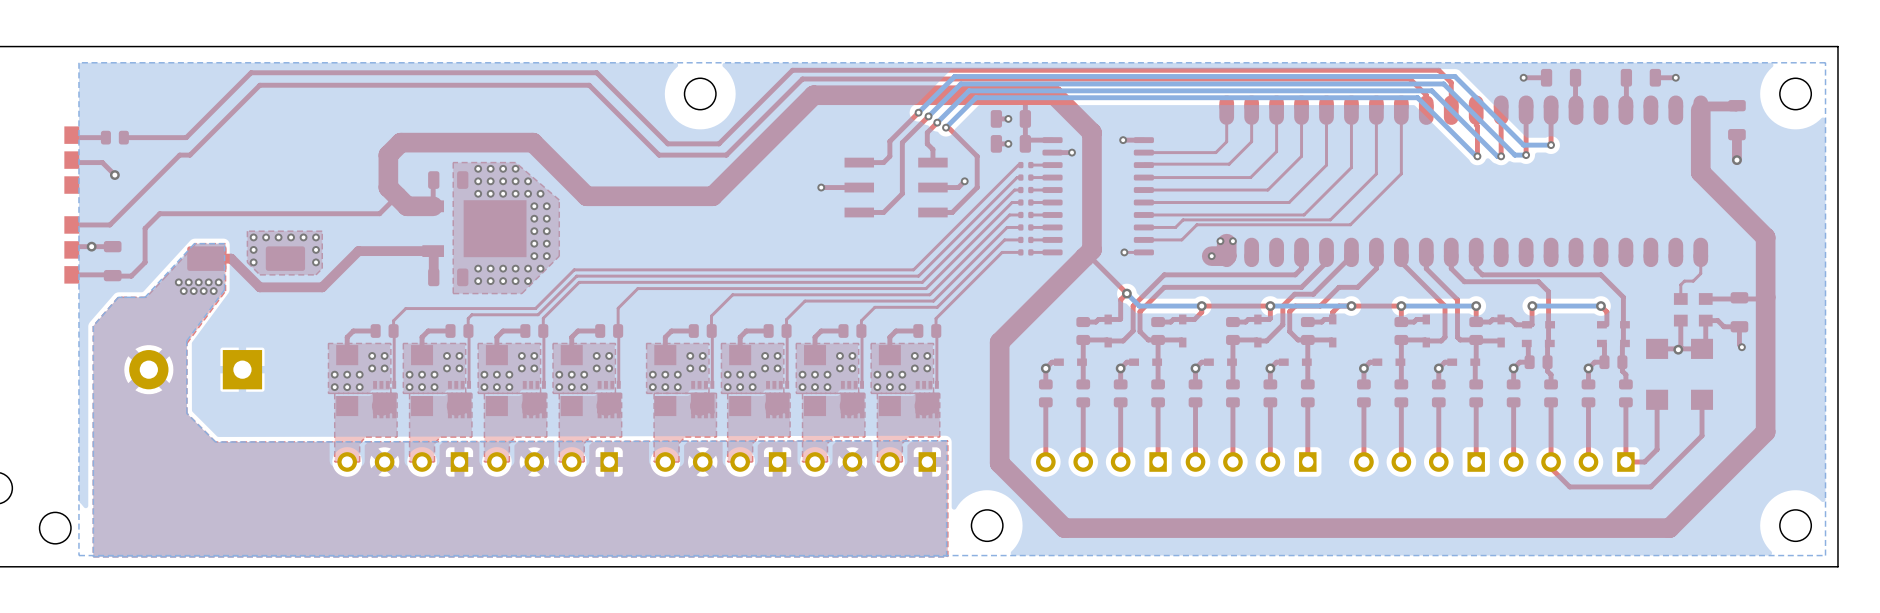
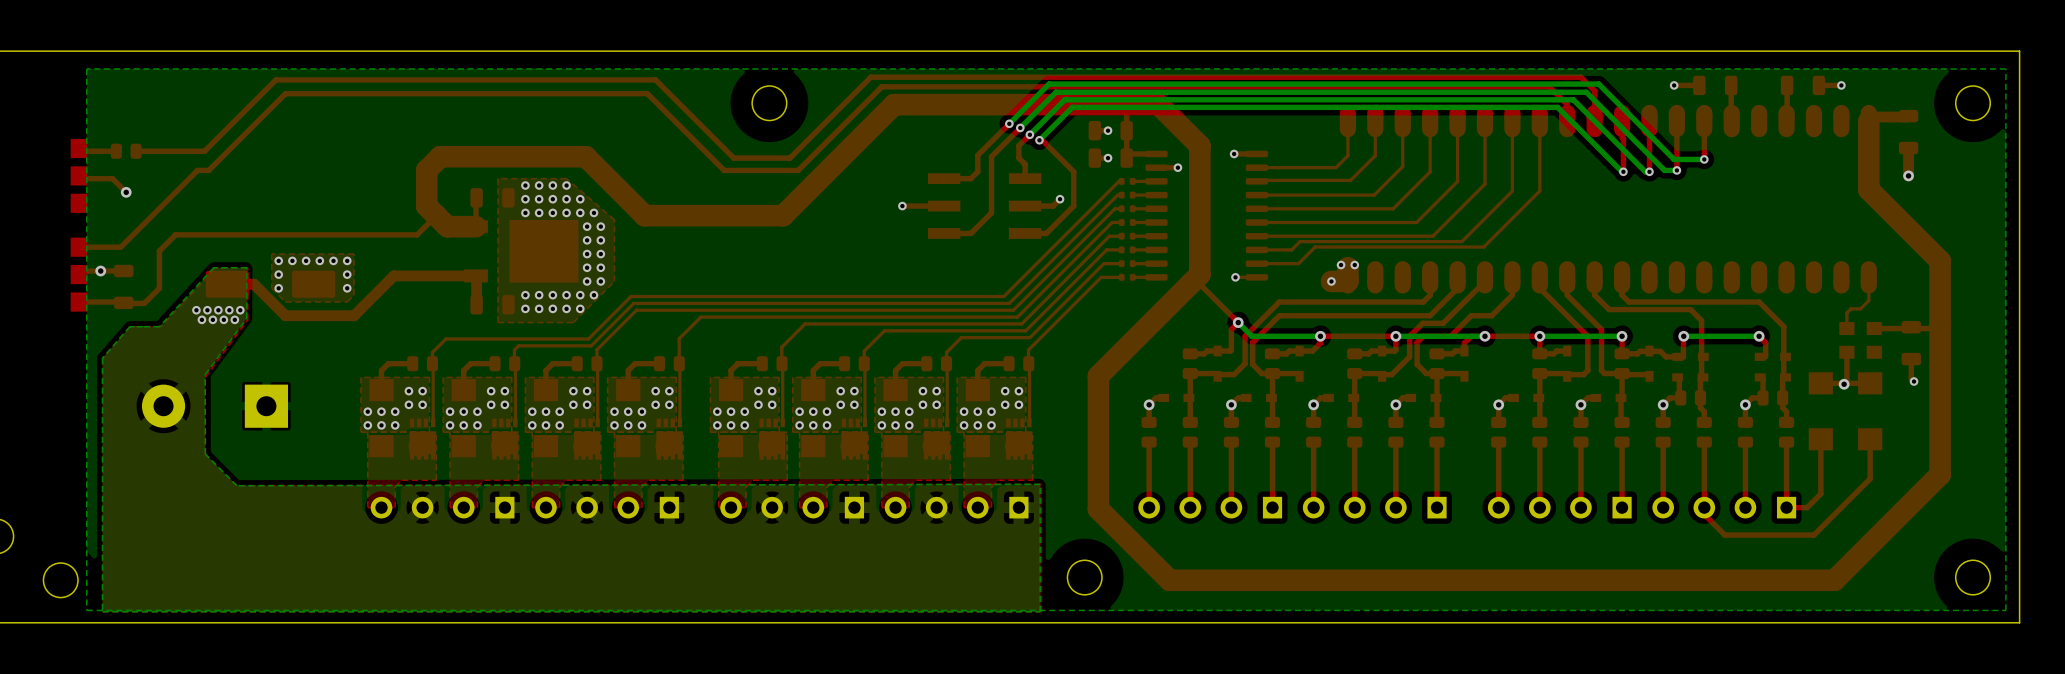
top track: (1739, 326) (1723, 326) (1717, 320) (1705, 320) (1705, 345) (1702, 348) -> none

